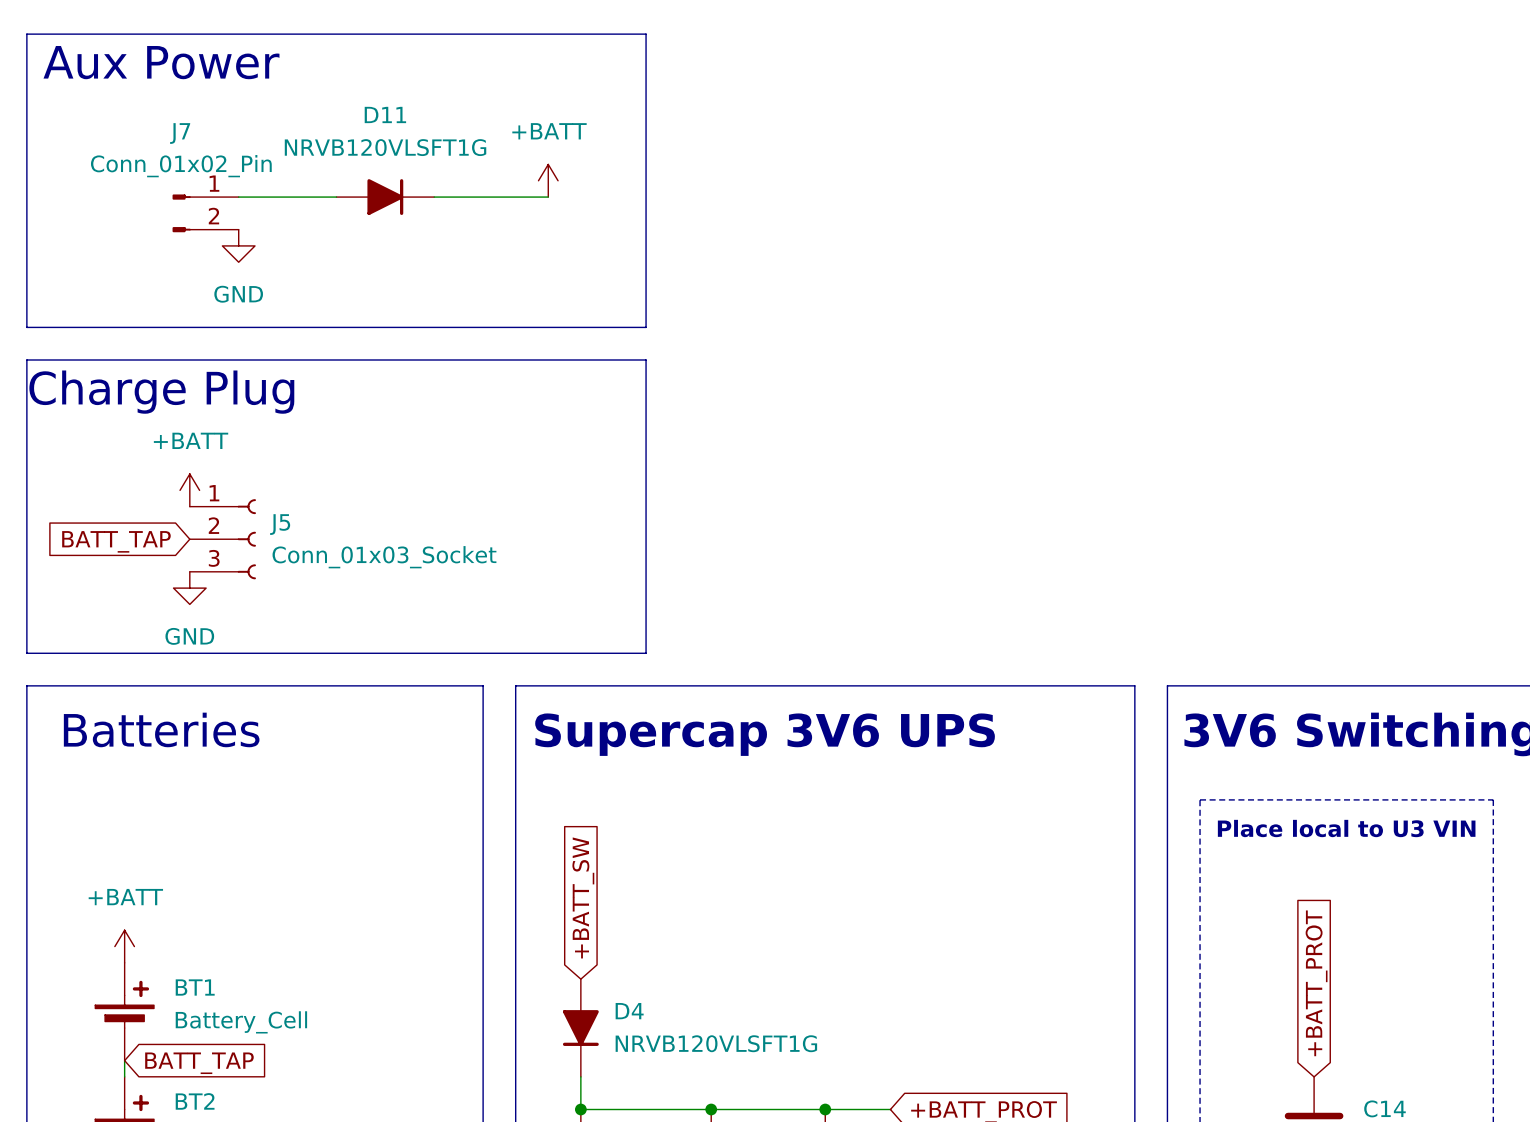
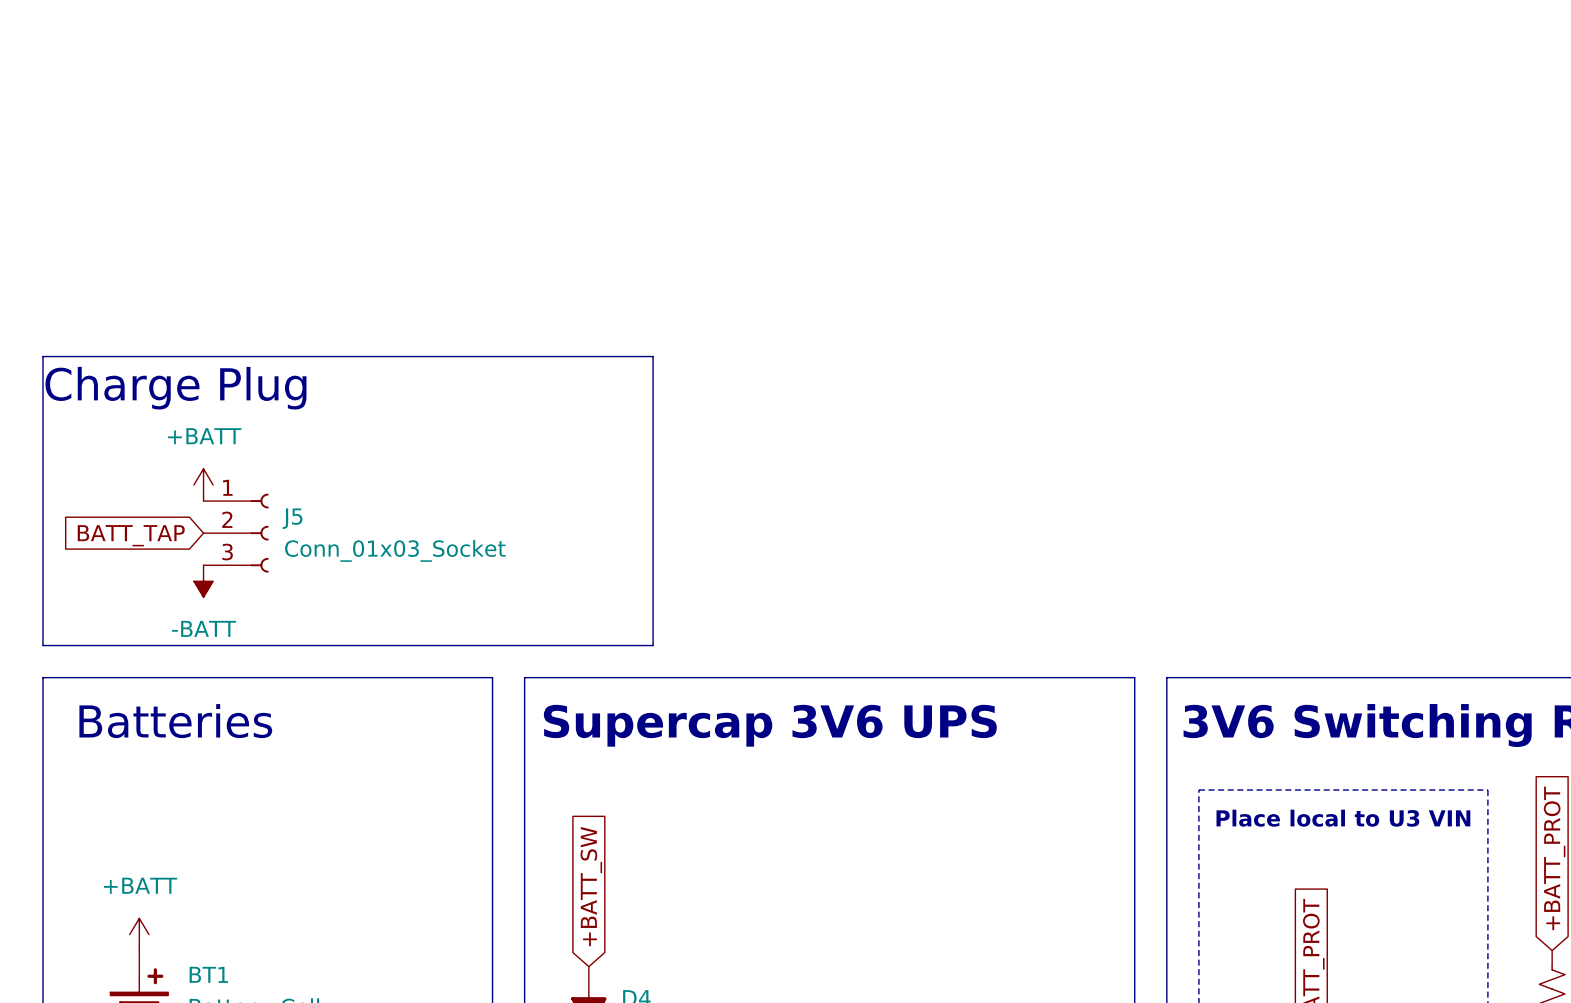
line: (26, 34) (646, 34) (646, 327) (26, 327) (26, 34) -> none
text: Aux Power (161, 62) -> none
power symbol: +BATT (548, 180) -> none
wire: (238, 197) (336, 197) -> none
D11: NRVB120VLSFT1G (385, 197) -> none
wire: (434, 197) (548, 197) -> none
J7: Conn_01x02_Pin (205, 213) -> none
power symbol: GND (238, 245) -> none
power symbol: GND (189, 588) -> -BATT (203, 581)

